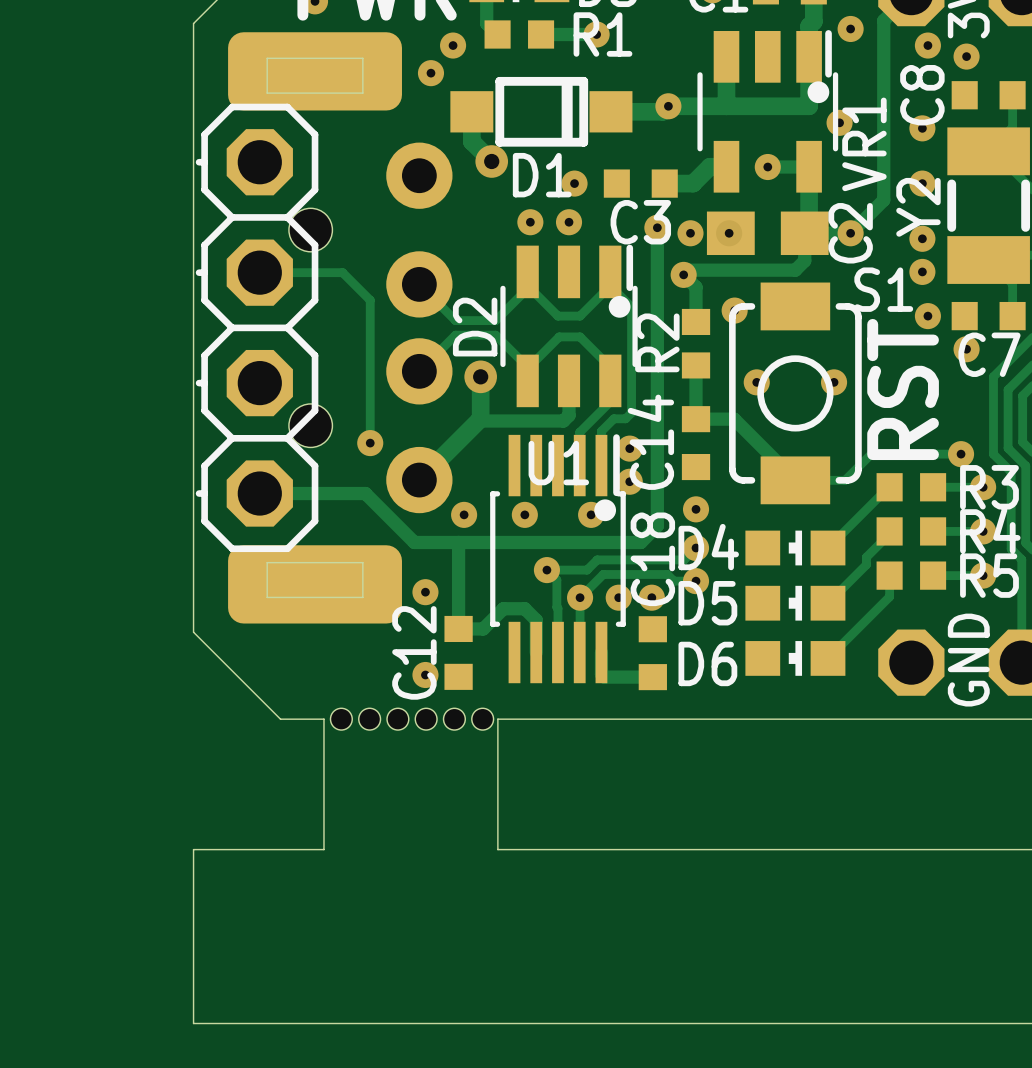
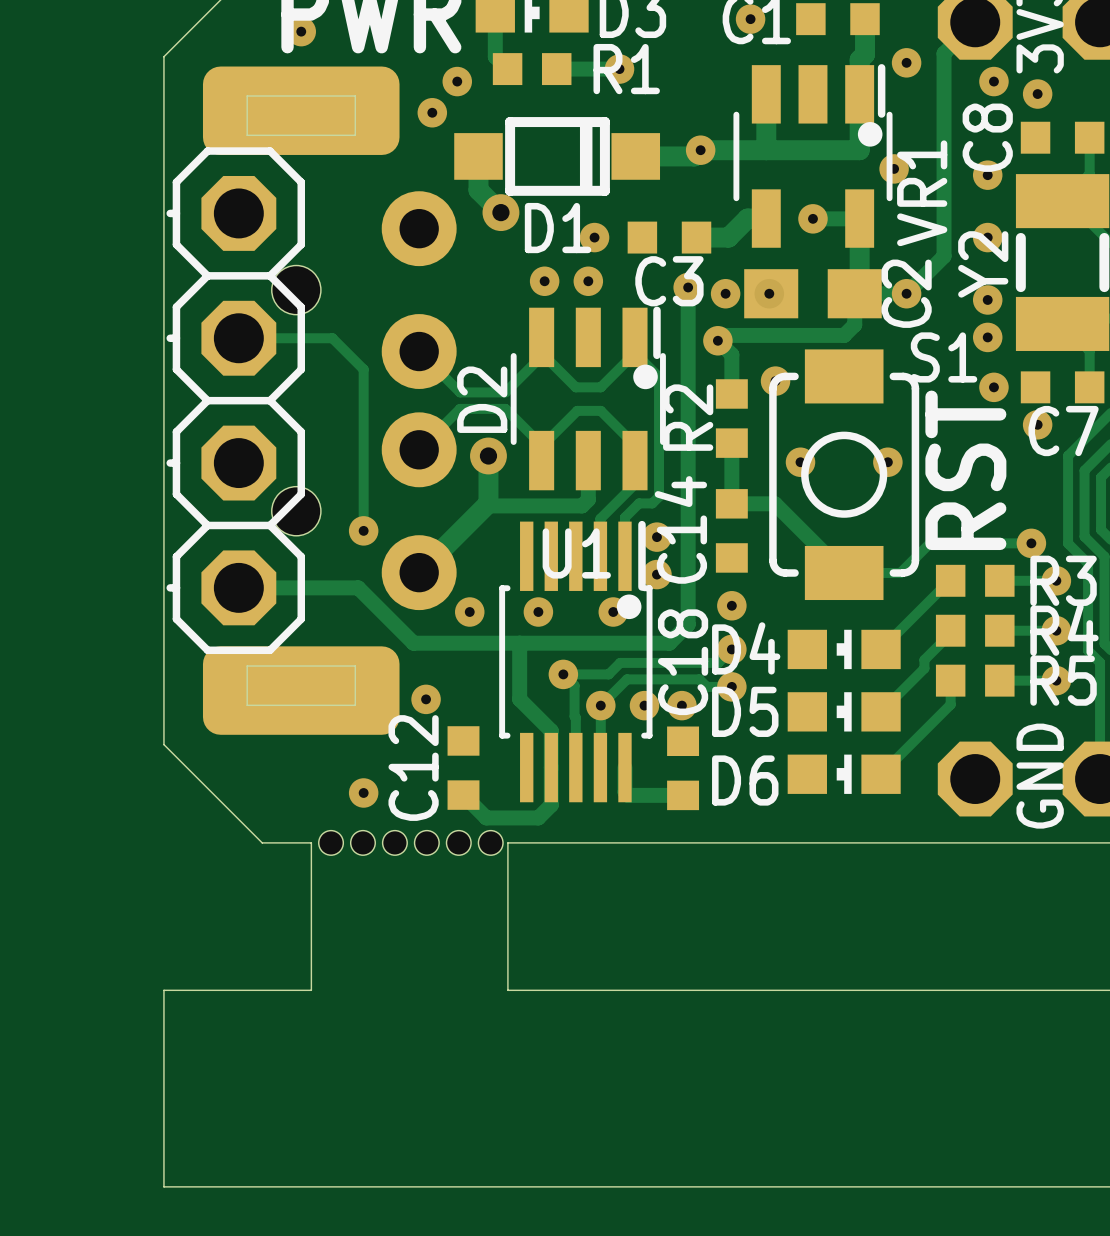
track: (458, 542) (458, 628) (483, 628) (503, 608) (524, 608) -> (519, 643) (519, 699) (538, 718)
track: none -> (551, 767) (551, 805) (538, 817) (486, 817) (463, 795)
via position: (425, 675) -> (363, 792)

